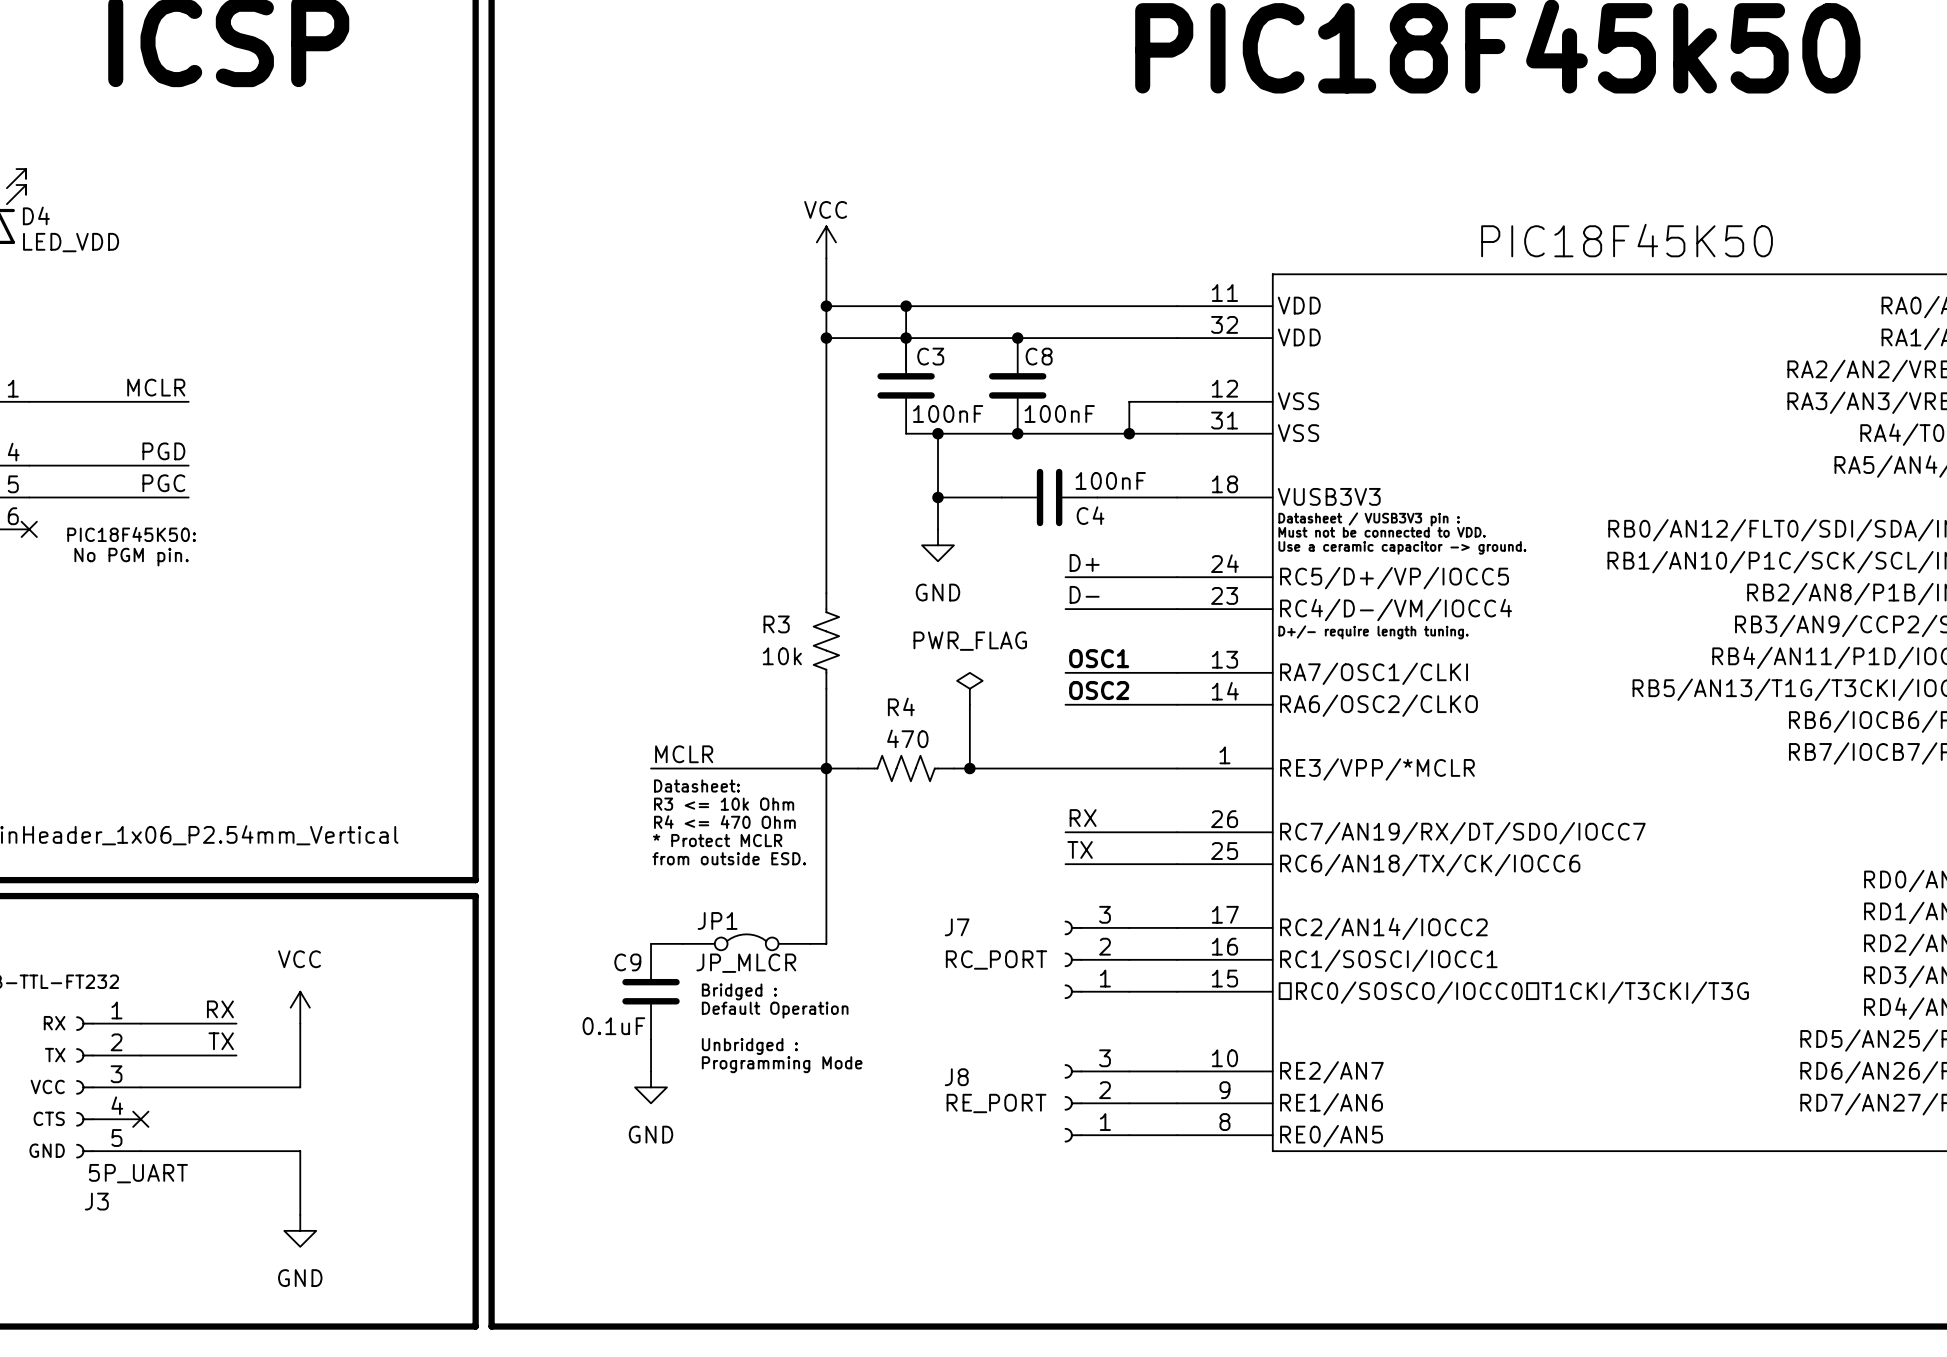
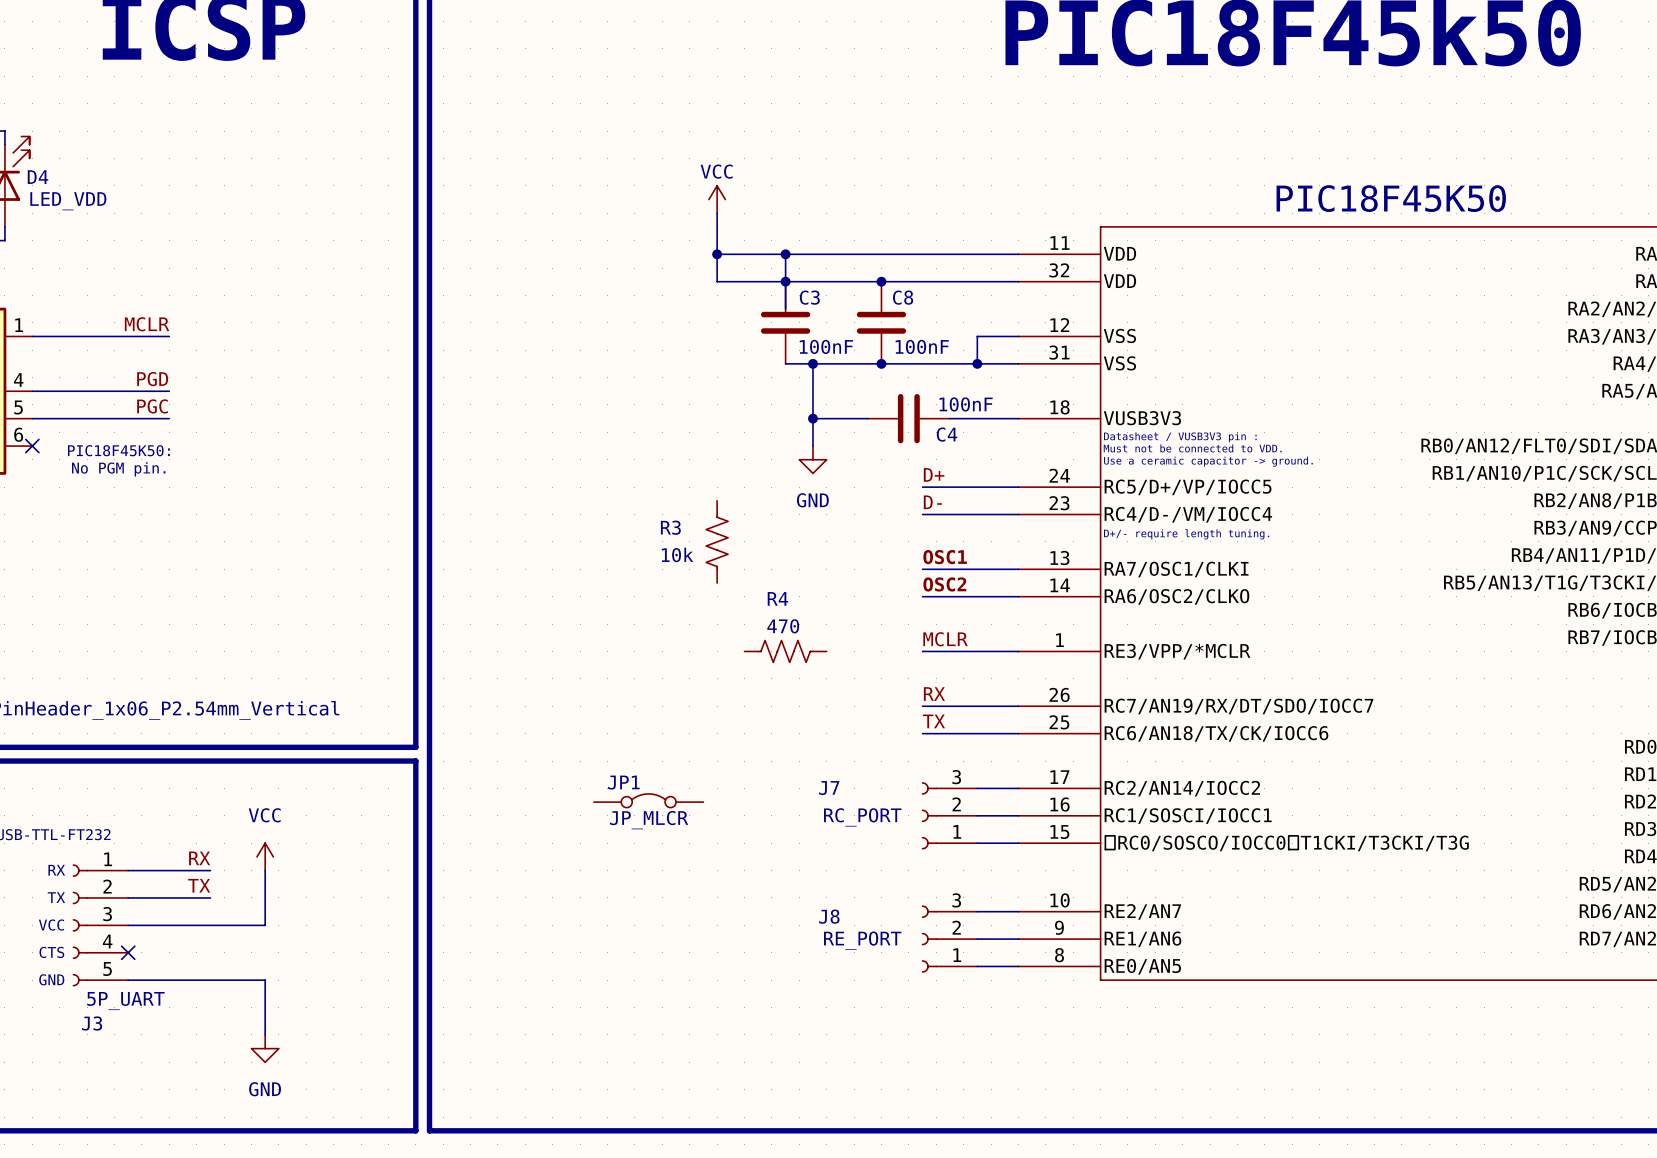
wire: (826, 338) (826, 593) -> none
junction: (826, 338) -> none
wire: (826, 688) (826, 943) (810, 943) -> none
power symbol: PWR_FLAG (969, 688) -> none
wire: (969, 704) (969, 768) -> none
label: MCLR (684, 754) -> none
label: none -> MCLR (945, 639)
wire: (651, 768) (858, 768) -> none
junction: (826, 768) -> none
wire: (953, 768) (1065, 768) -> none
junction: (969, 768) -> none
text: Datasheet: (696, 785) -> none
text: R3 <= 10k Ohm (724, 804) -> none
text: R4 <= 470 Ohm (724, 822) -> none
text: * Protect MCLR (717, 840) -> none
text: from outside ESD. (729, 858) -> none
wire: (651, 943) (682, 943) -> none
C9: 0.1uF (651, 991) -> none
text: Bridged : (739, 991) -> none
text: Default Operation (775, 1010) -> none
wire: (651, 1039) (651, 1071) -> none
text: Unbridged : (749, 1046) -> none
text: Programming Mode (782, 1064) -> none
power symbol: GND (651, 1087) -> none

